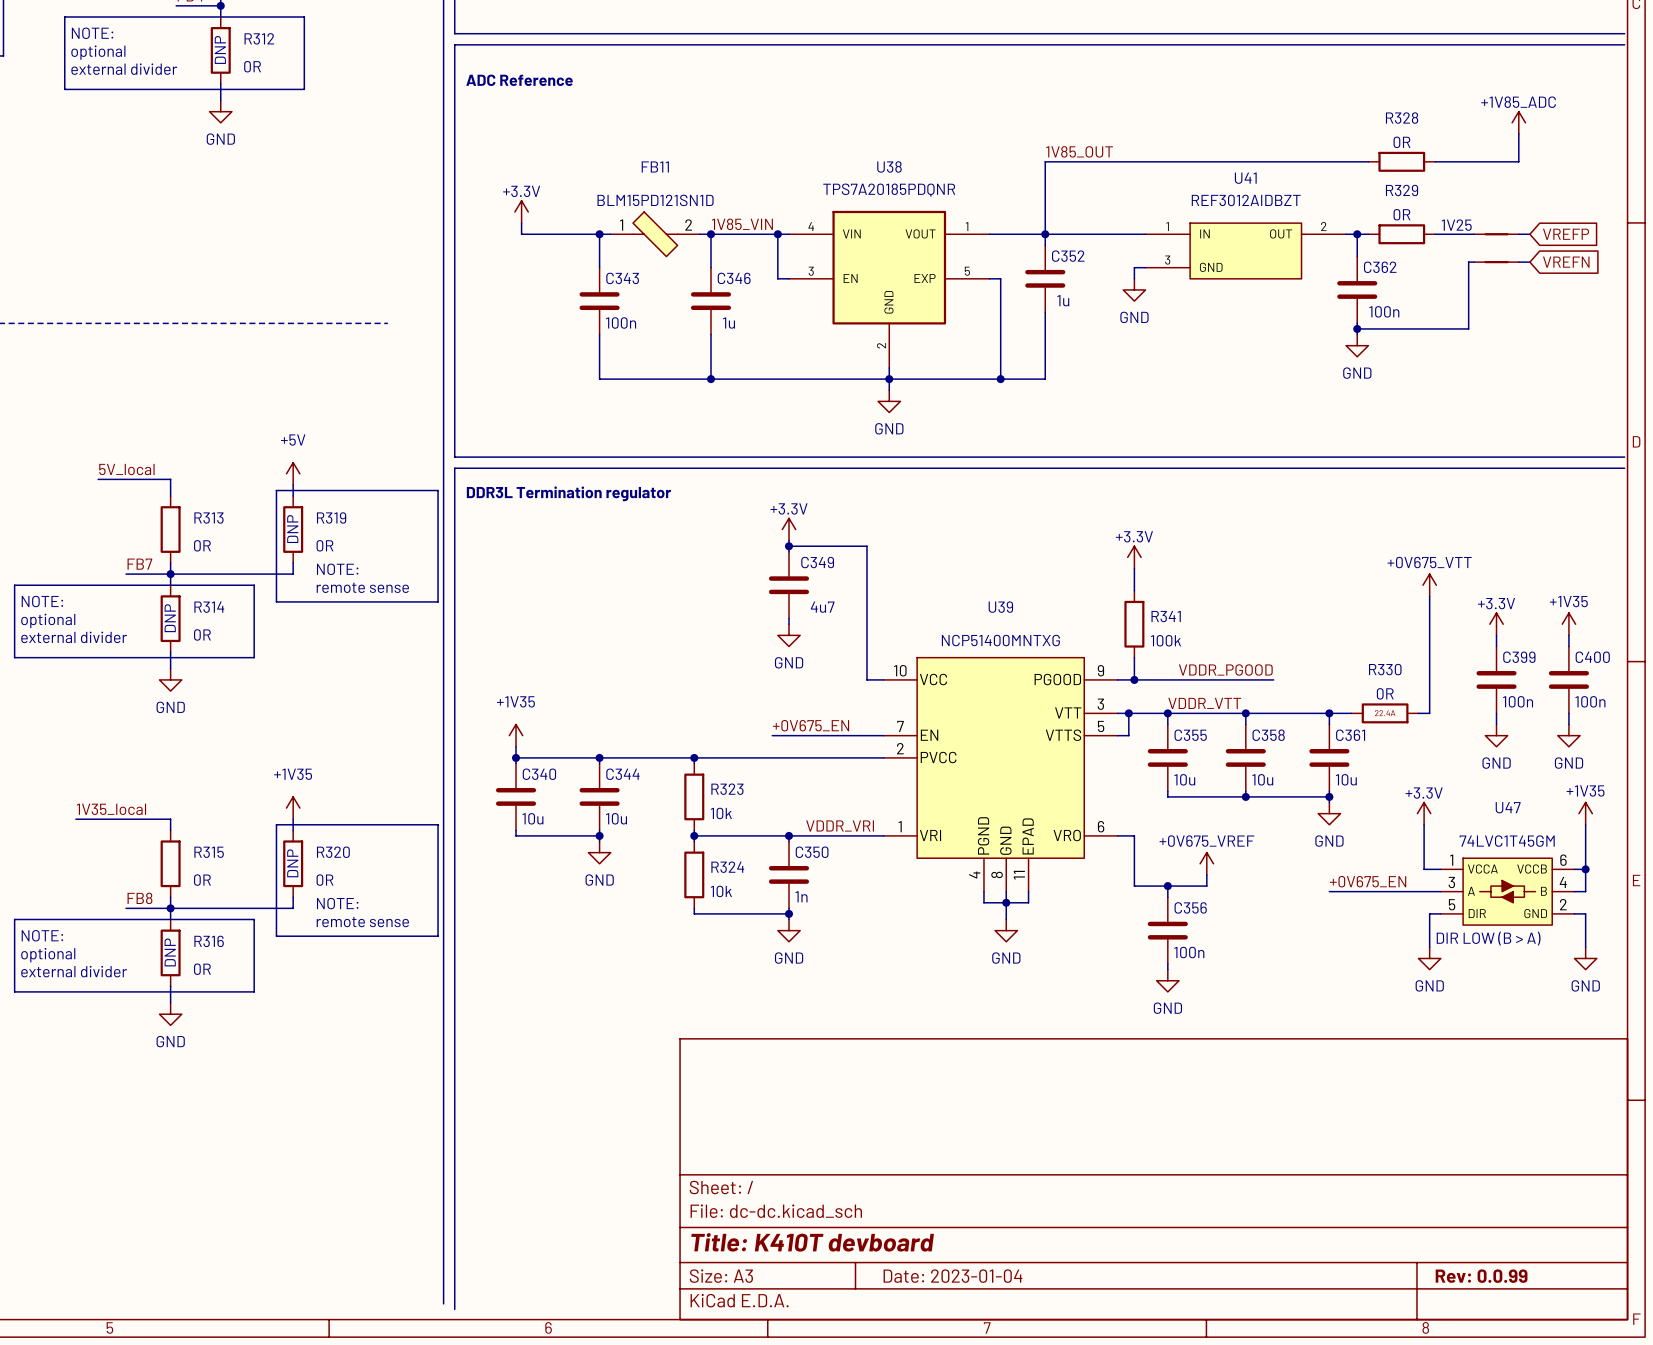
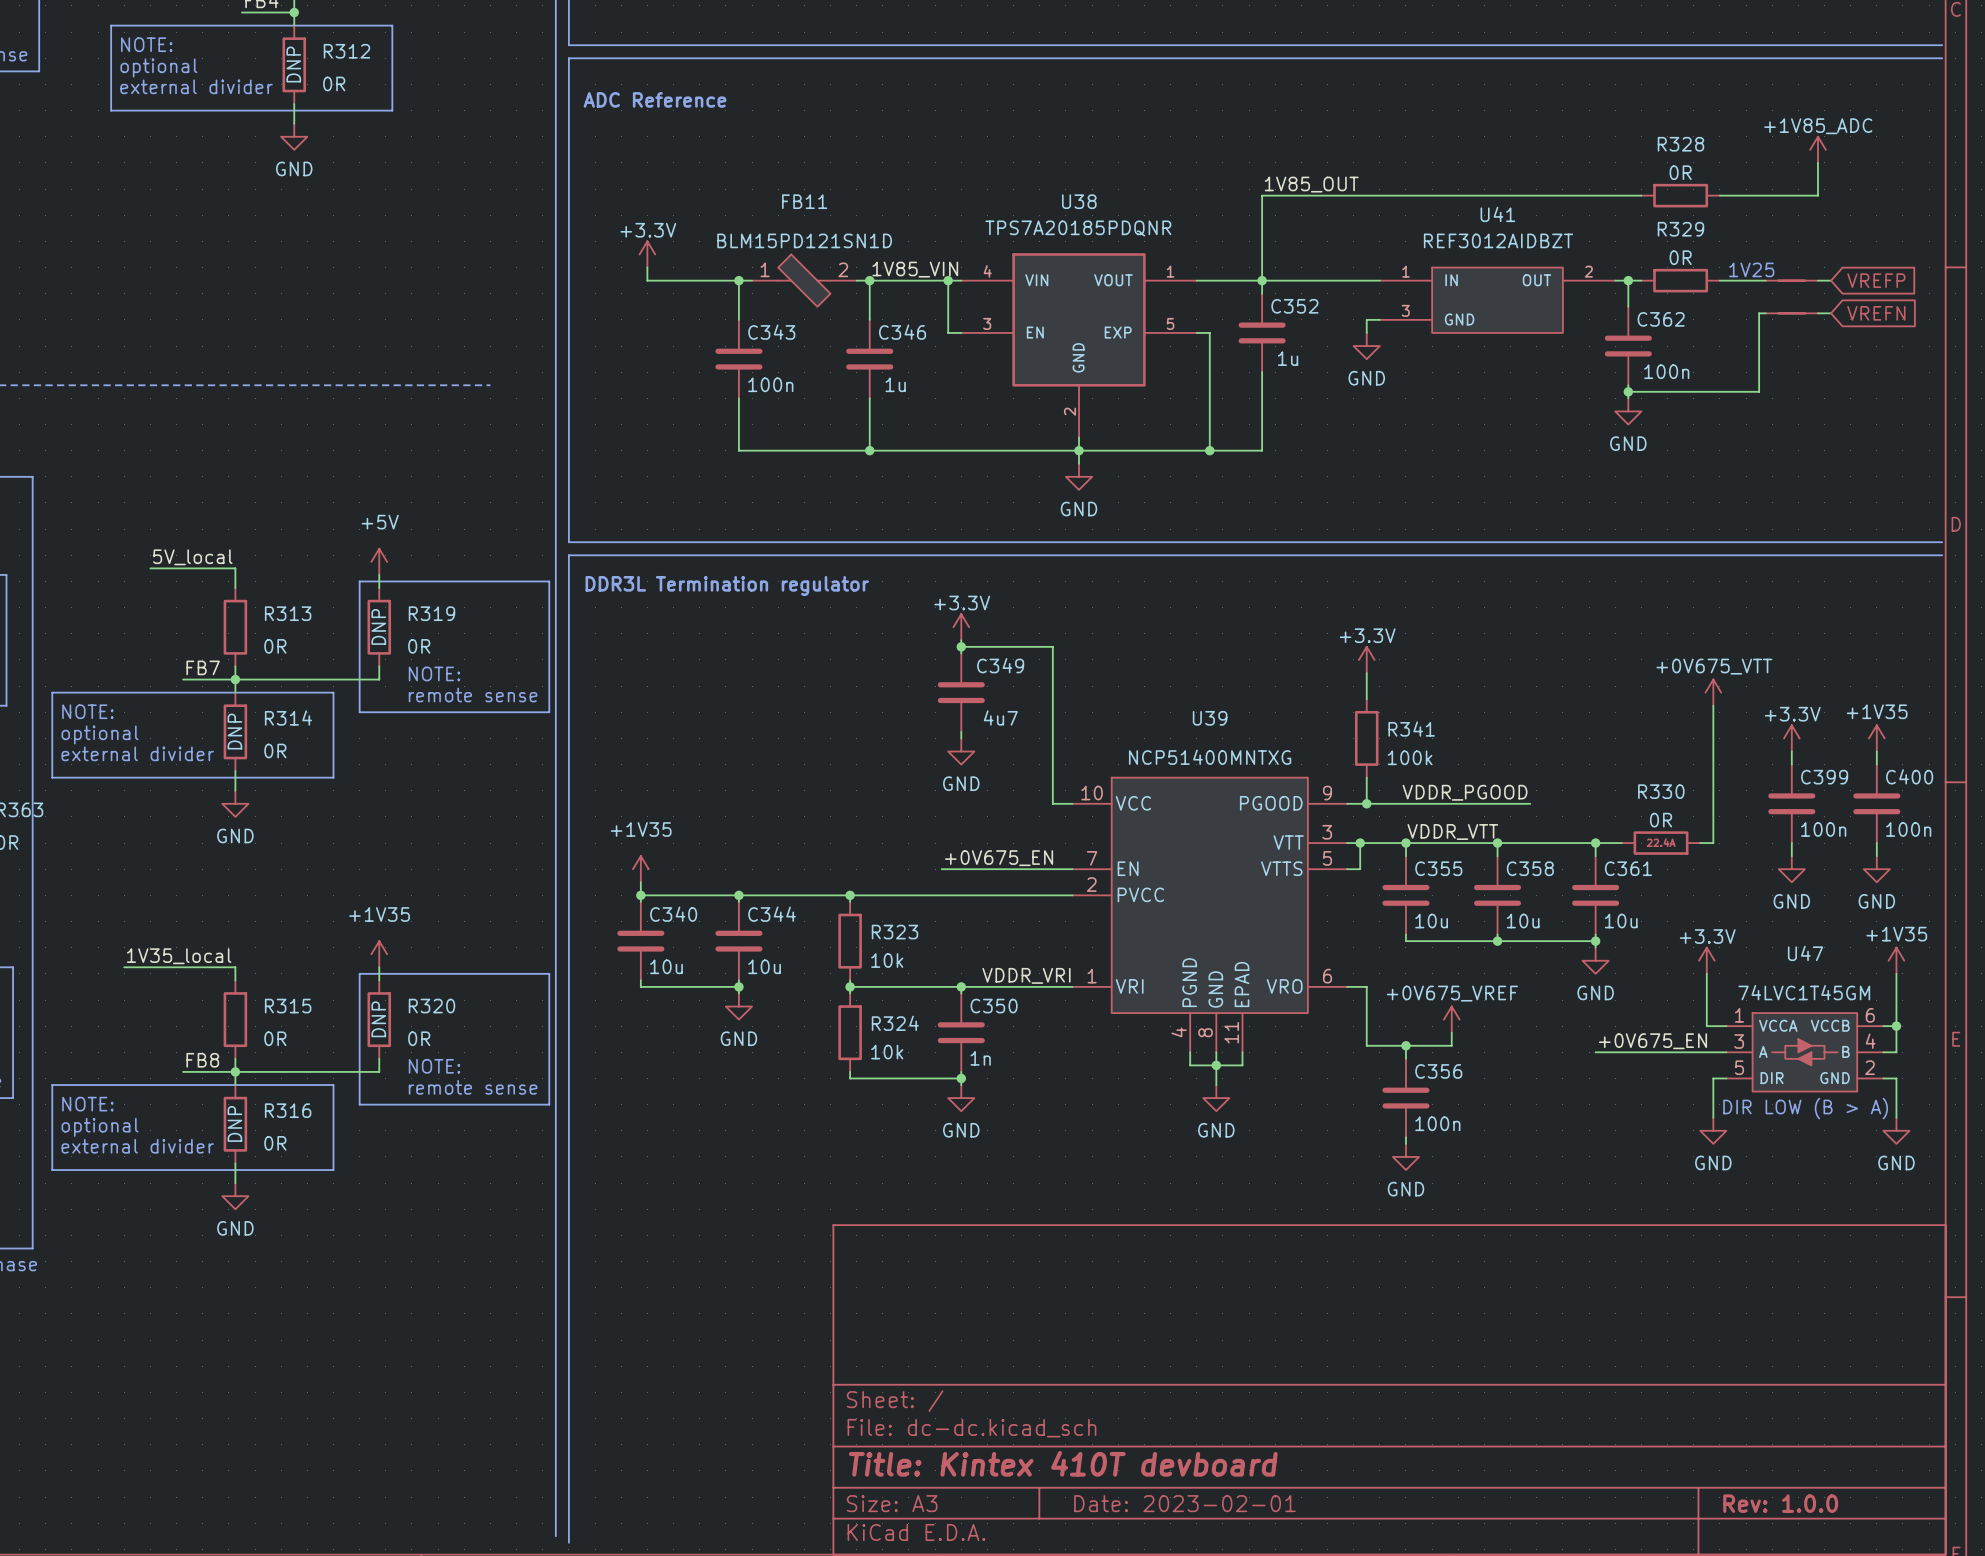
title block: Title: K410T devboard (812, 1242) -> Title: Kintex 410T devboard (1063, 1463)
title block: Date: 2023-01-04 (952, 1276) -> Date: 2023-02-01 (1184, 1503)
title block: Rev: 0.0.99 (1481, 1276) -> Rev: 1.0.0 (1780, 1503)

